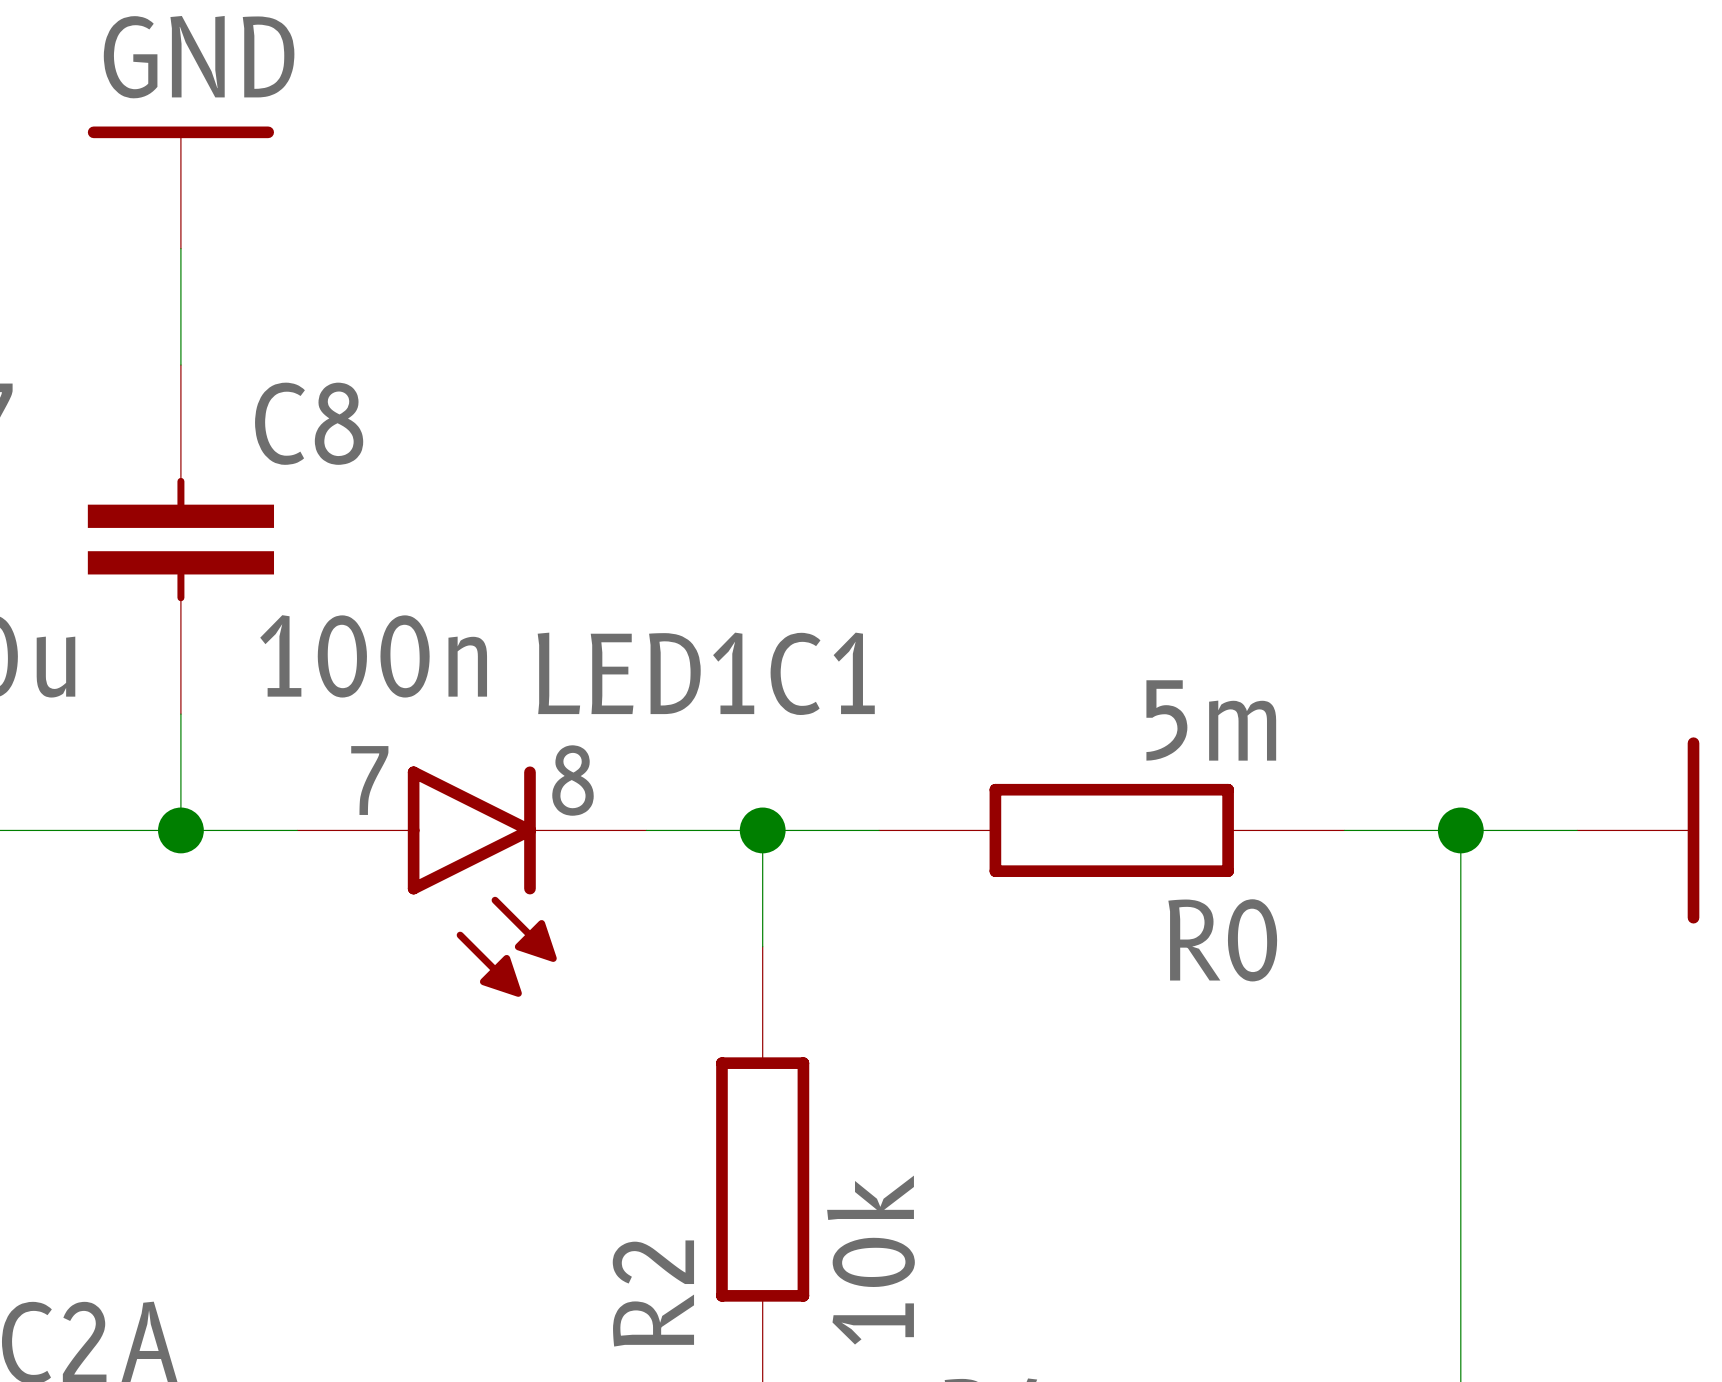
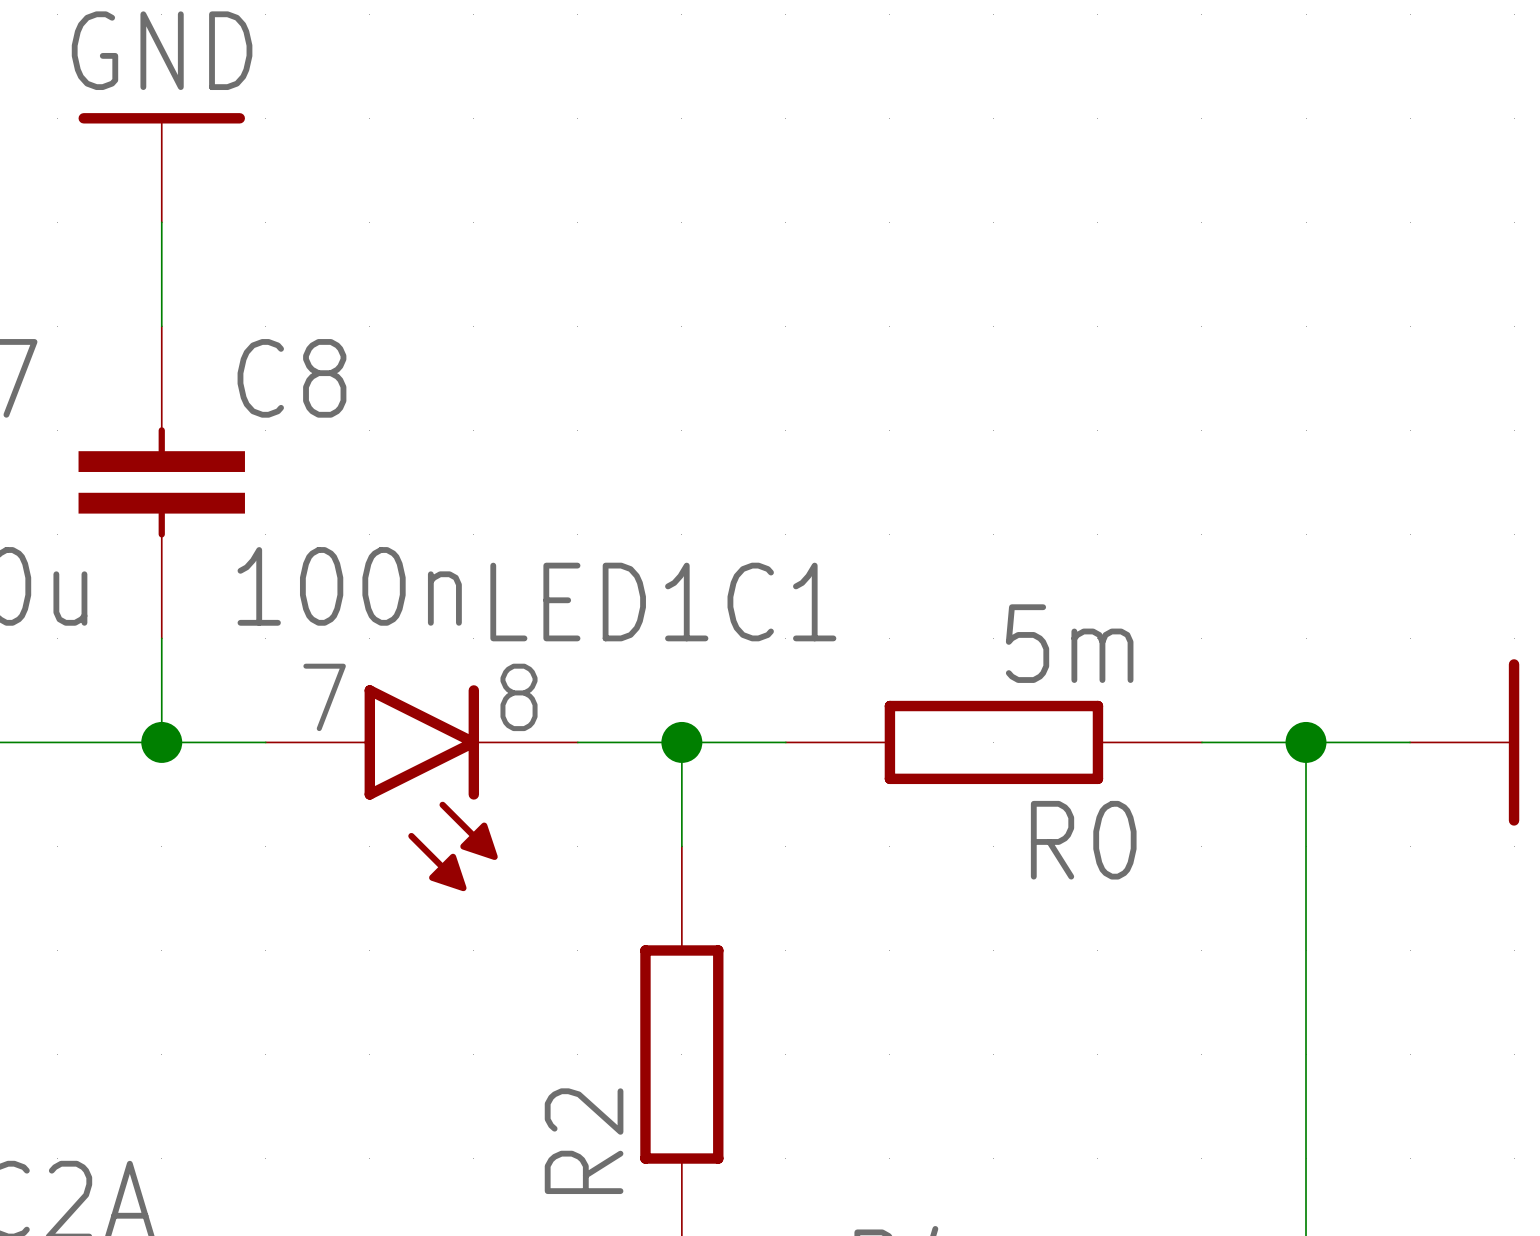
R2 value: 10k (871, 1260) -> none

